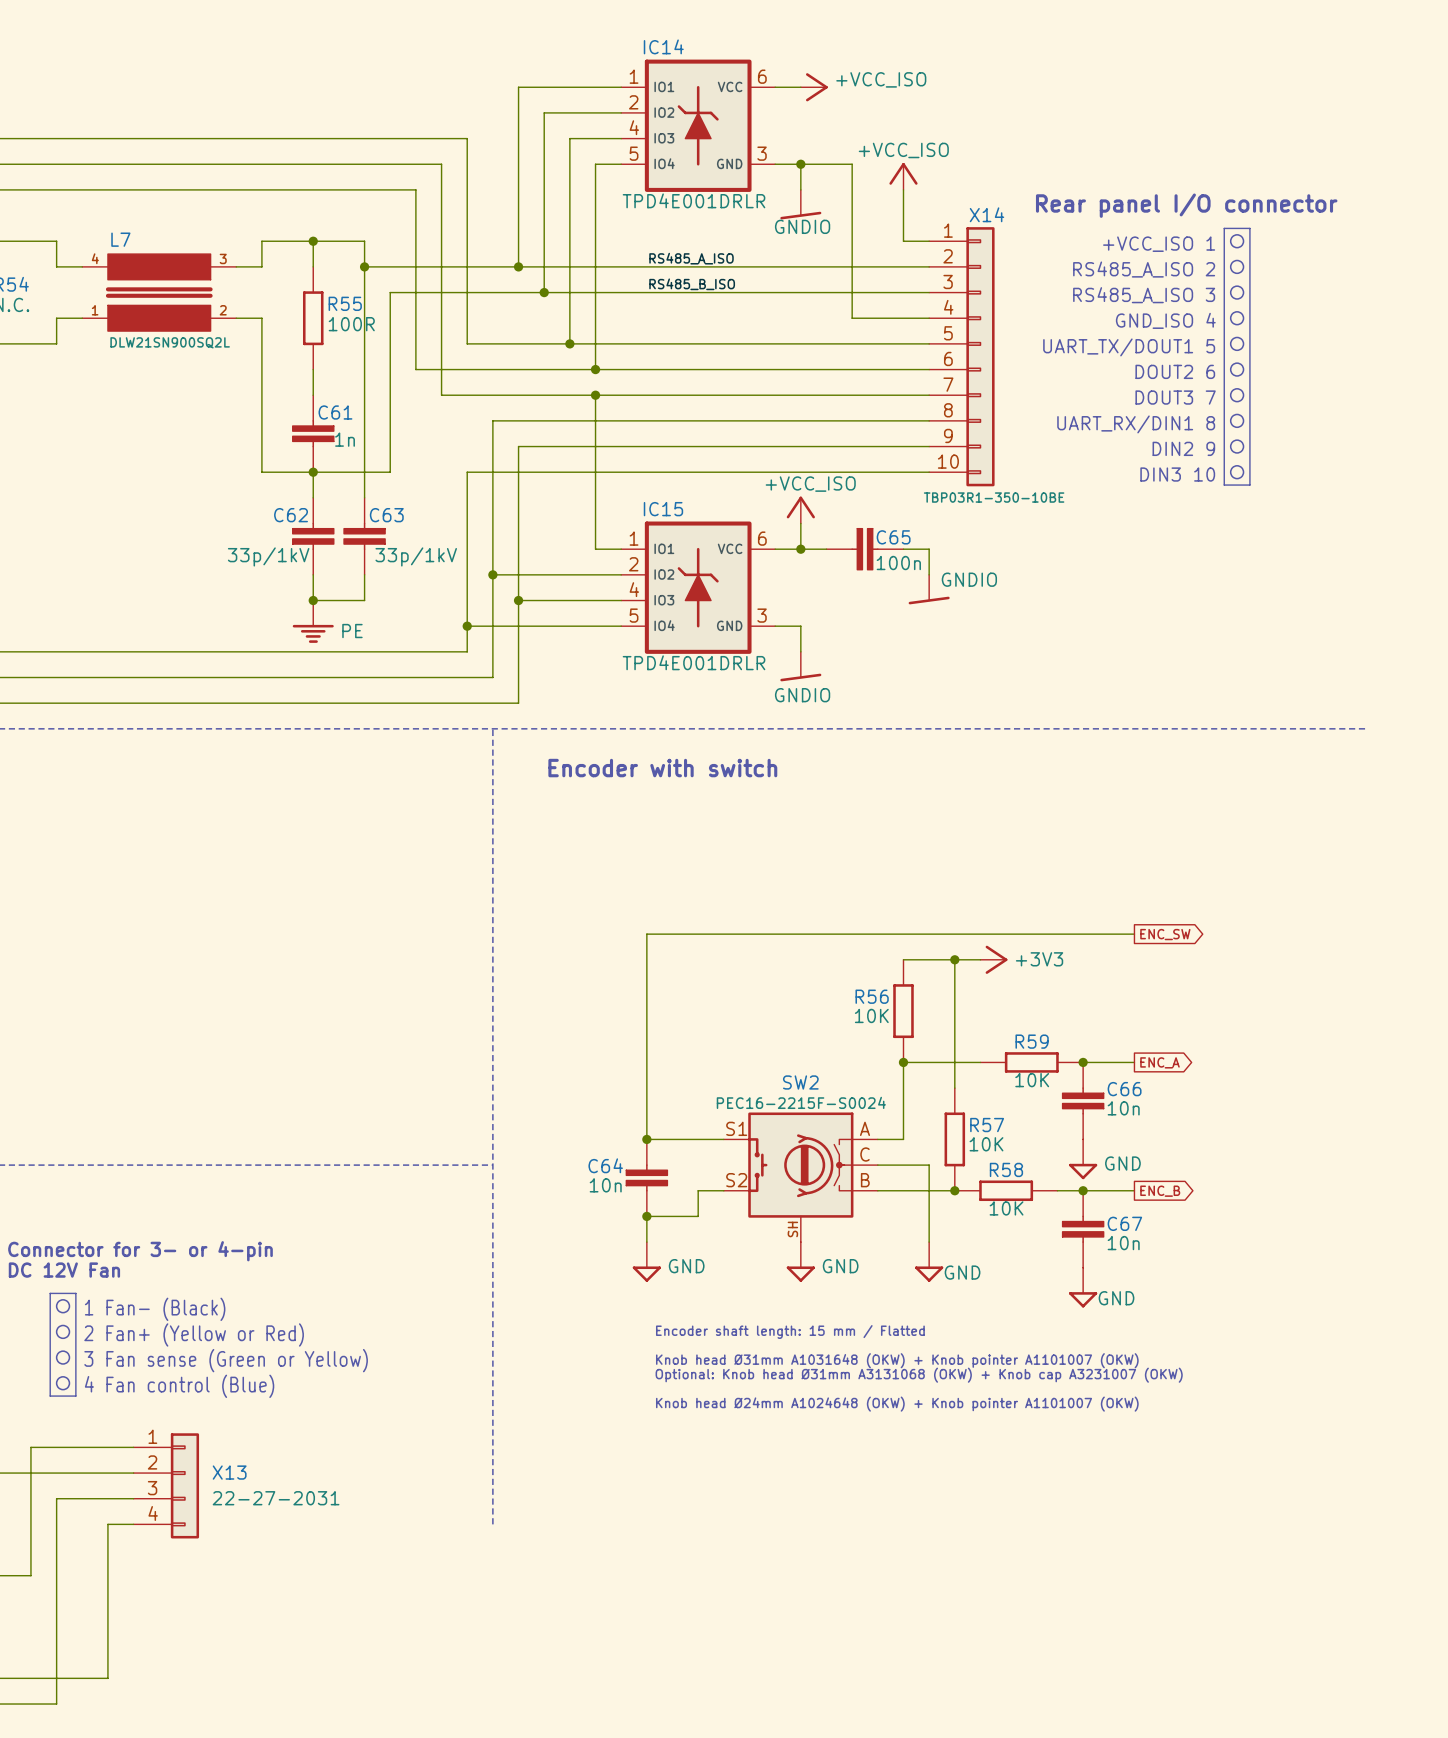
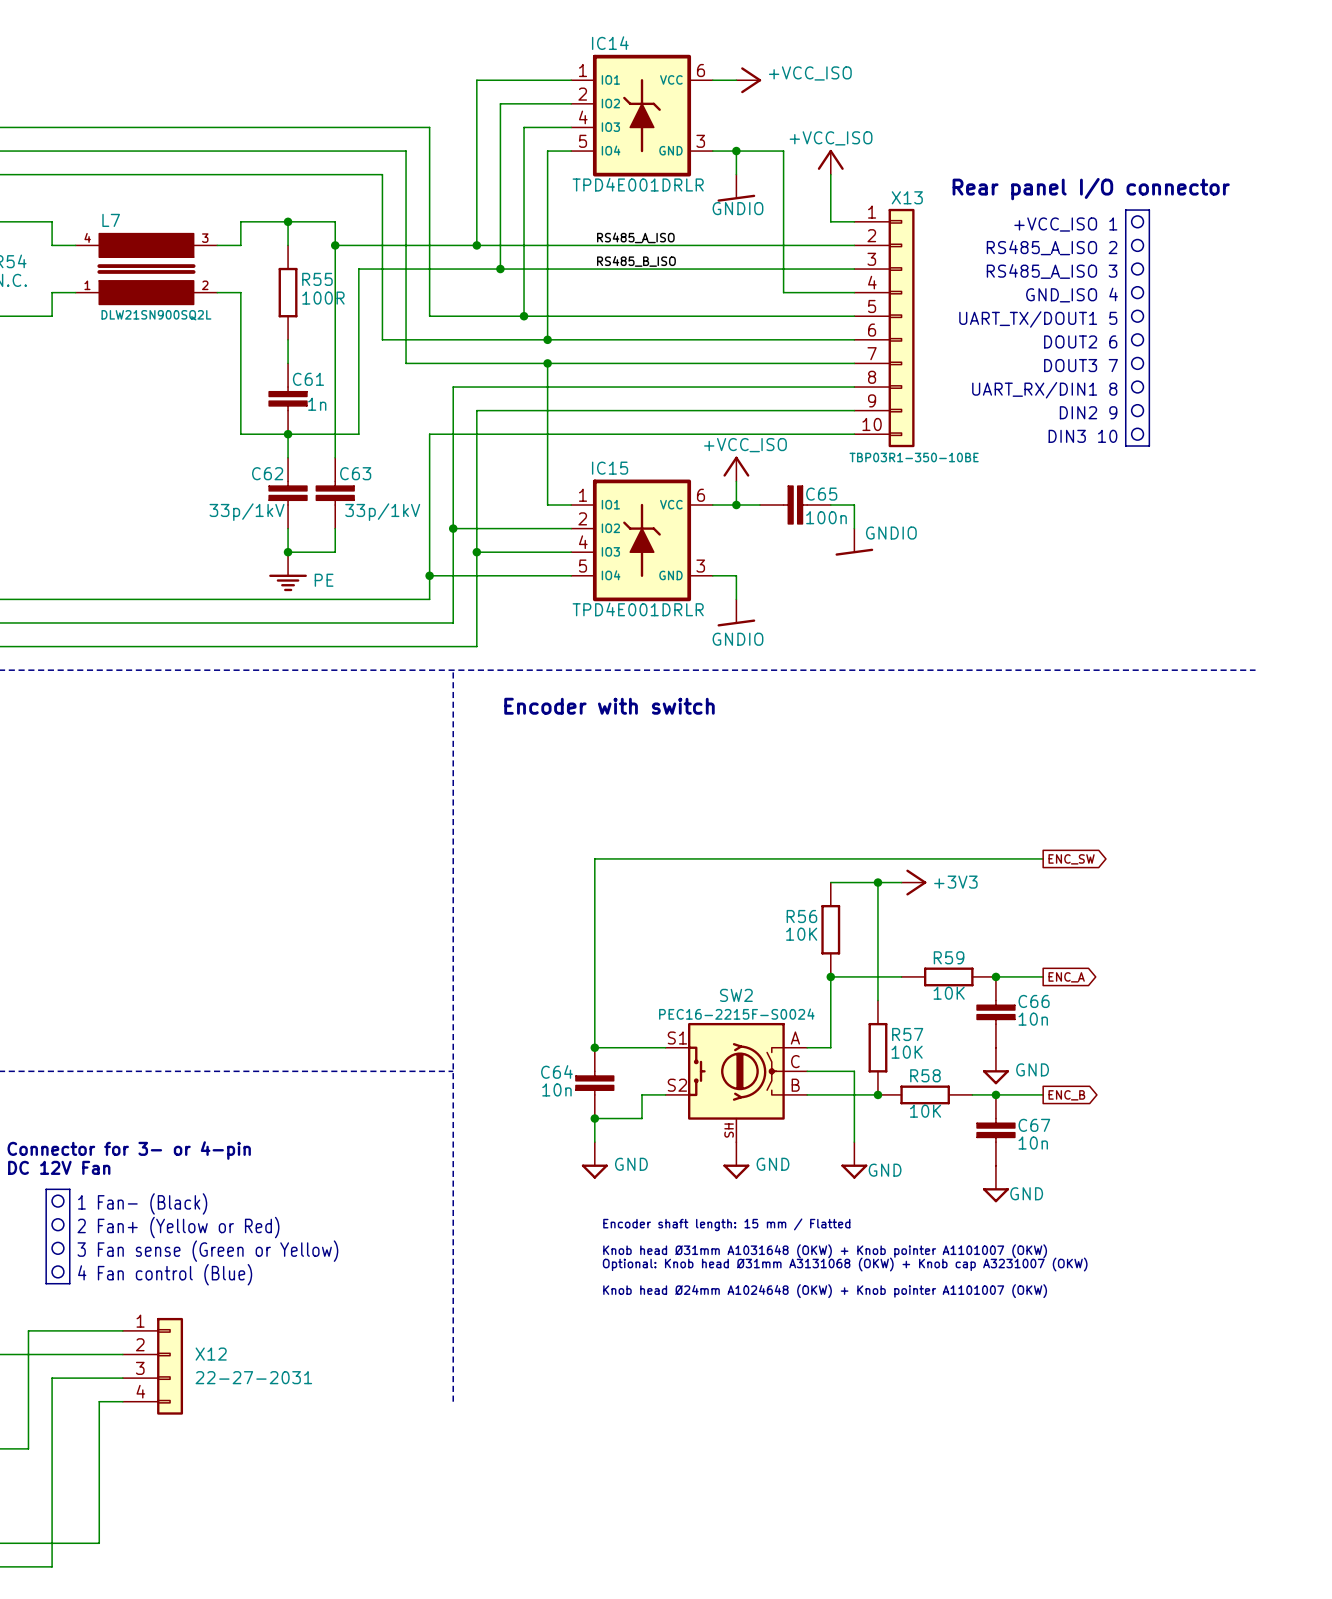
X14 name: X14 (986, 214) -> X13 (907, 197)
X13 name: X13 (229, 1472) -> X12 (211, 1354)

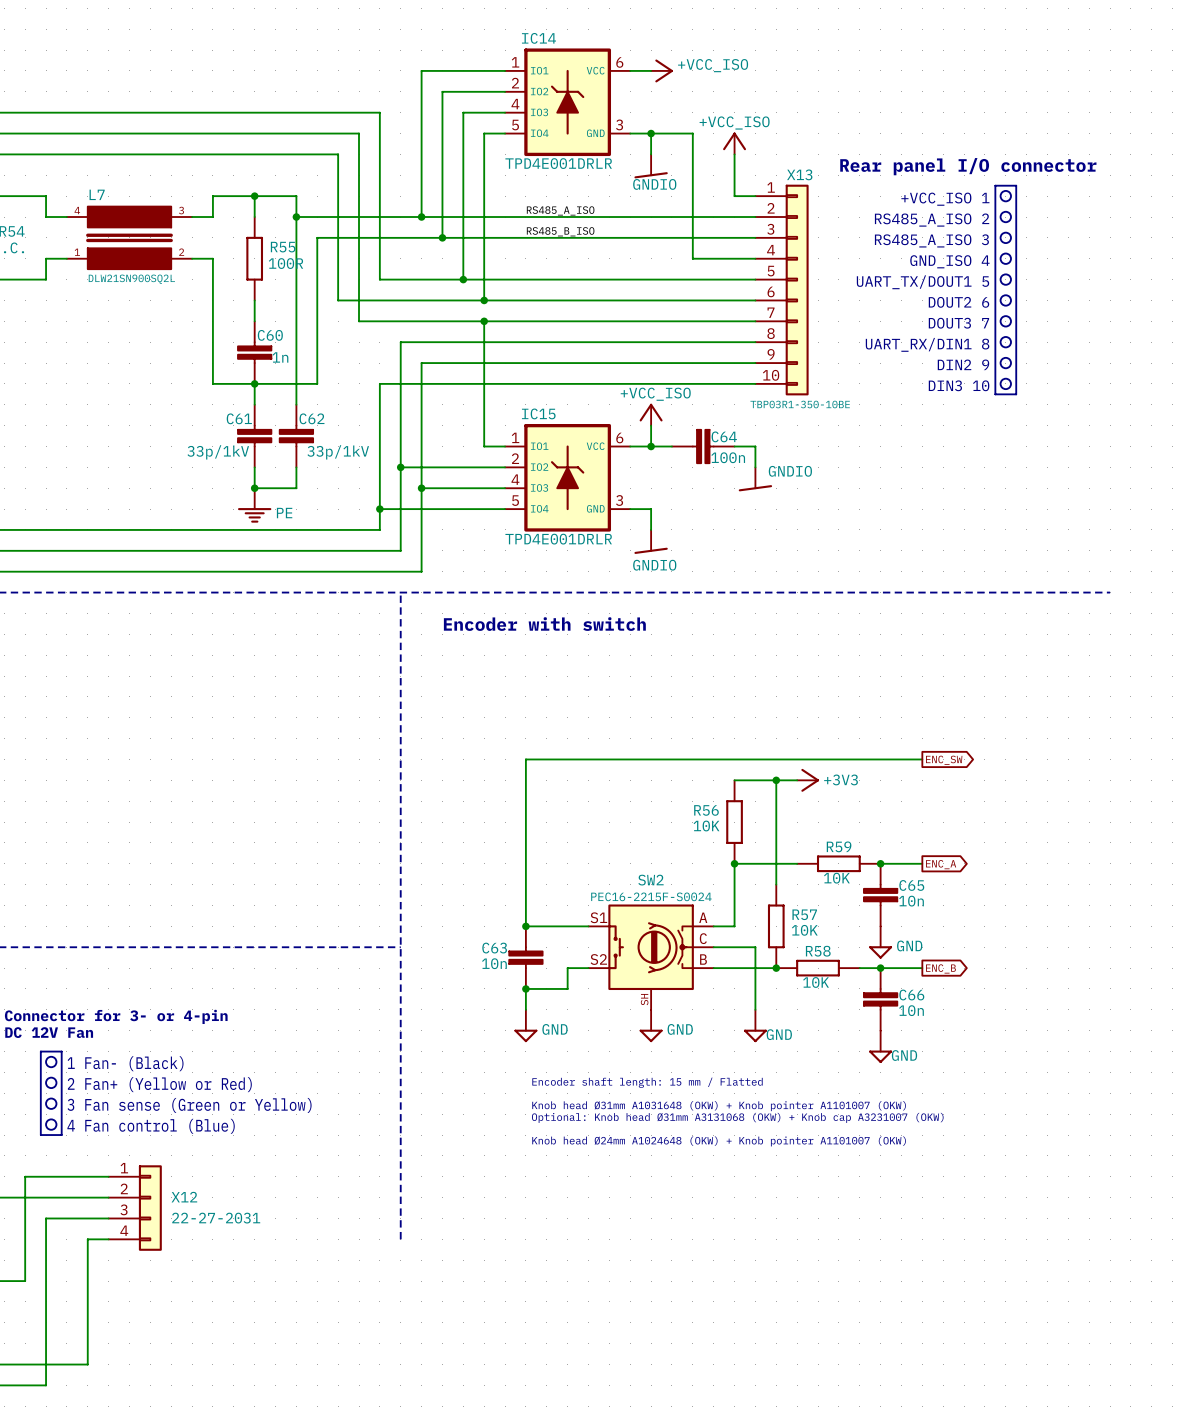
C61 name: C61 (308, 379) -> C60 (270, 335)
C62 name: C62 (267, 473) -> C61 (239, 418)
C63 name: C63 (355, 473) -> C62 (312, 418)
C65 name: C65 (821, 494) -> C64 (724, 436)
C66 name: C66 (1034, 1001) -> C65 (911, 885)
C64 name: C64 (556, 1071) -> C63 (494, 948)
C67 name: C67 (1034, 1125) -> C66 (911, 995)

